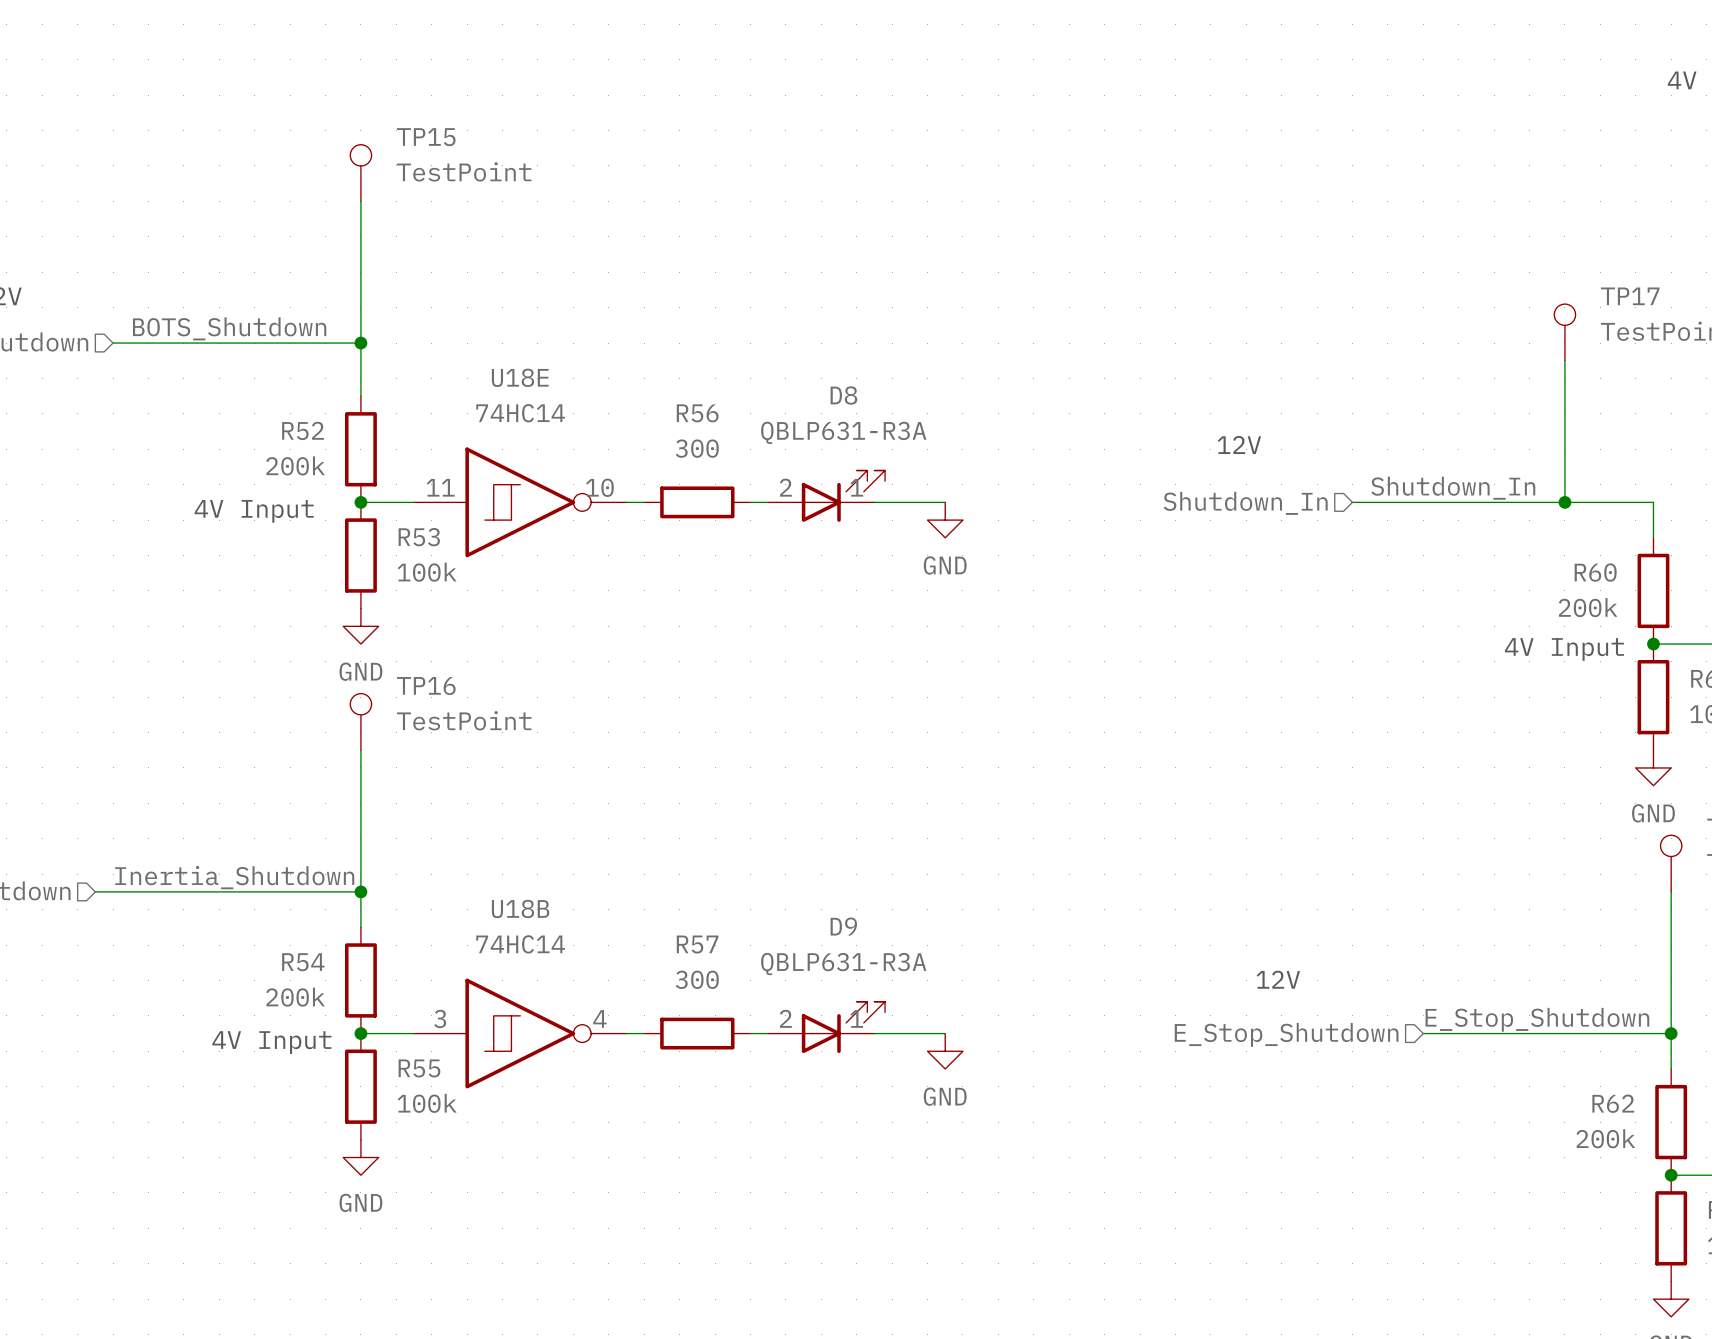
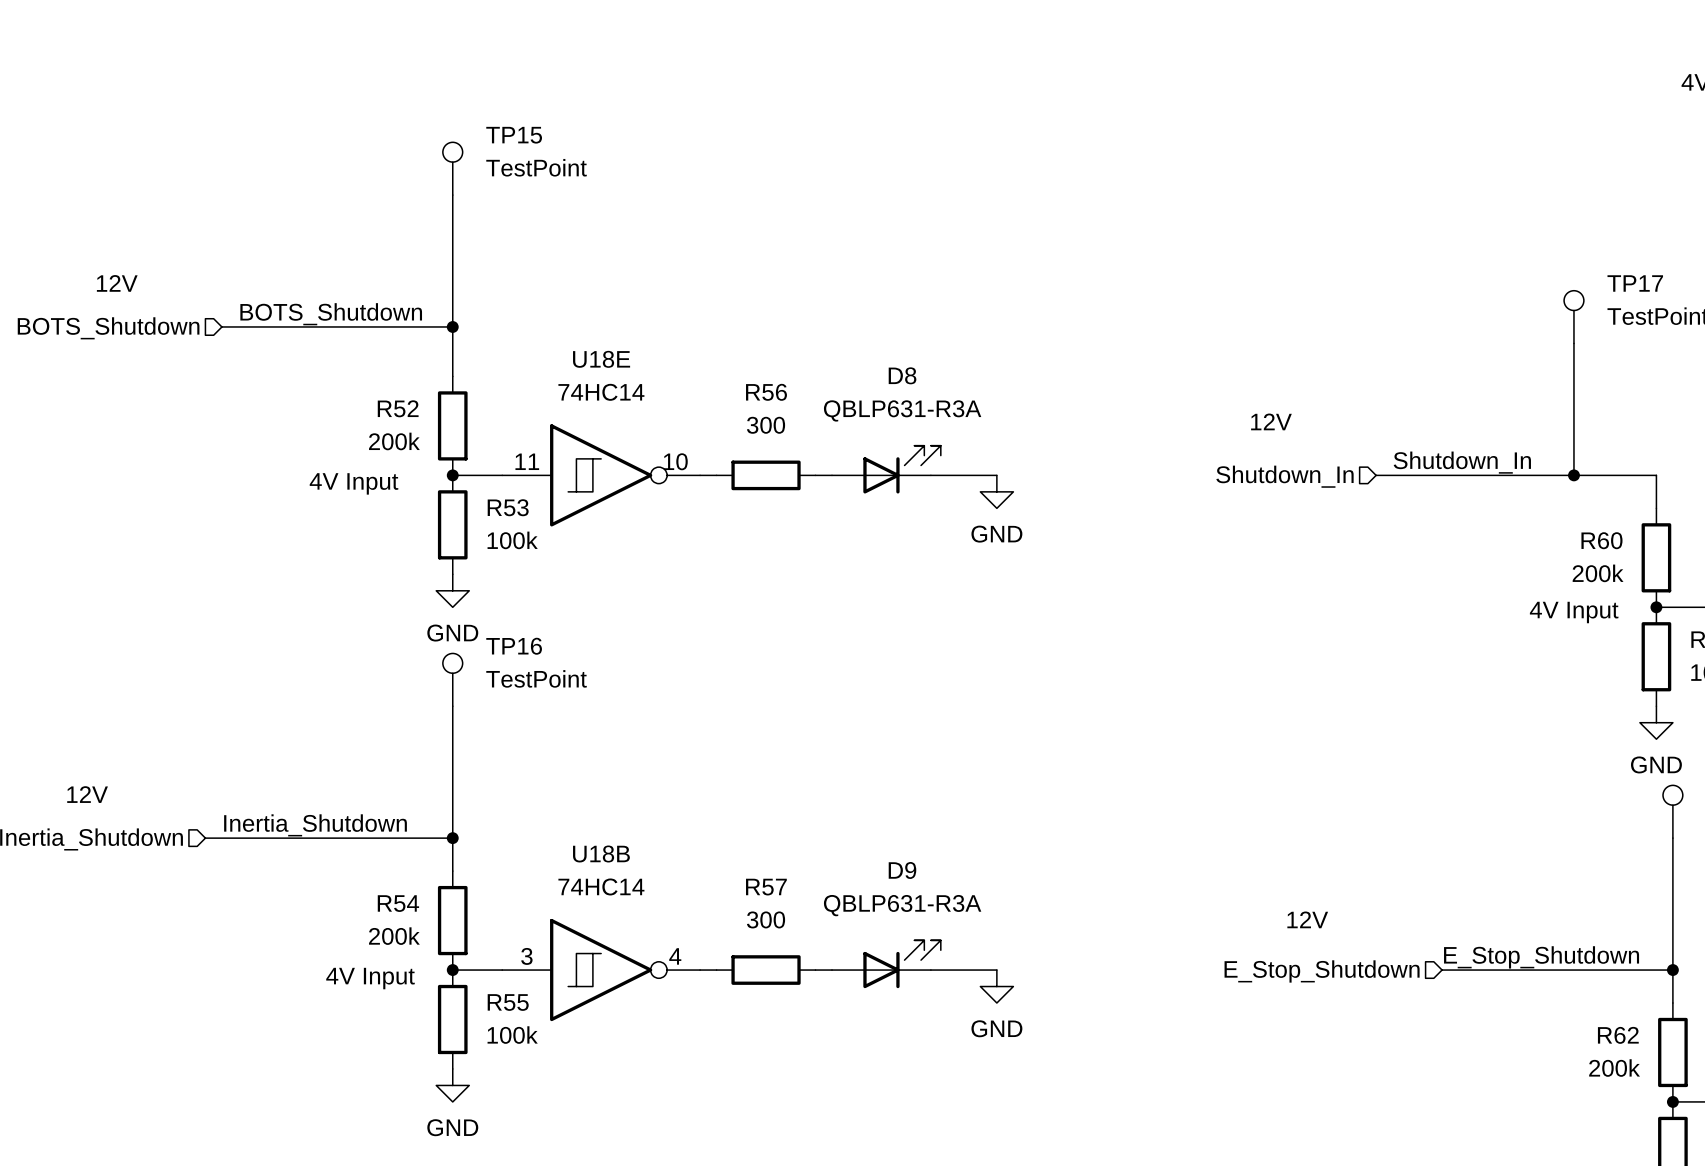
D8 pin number: 2 (785, 487) -> none
D8 pin number: 1 (856, 487) -> none
D9 pin number: 2 (785, 1018) -> none
D9 pin number: 1 (856, 1018) -> none

